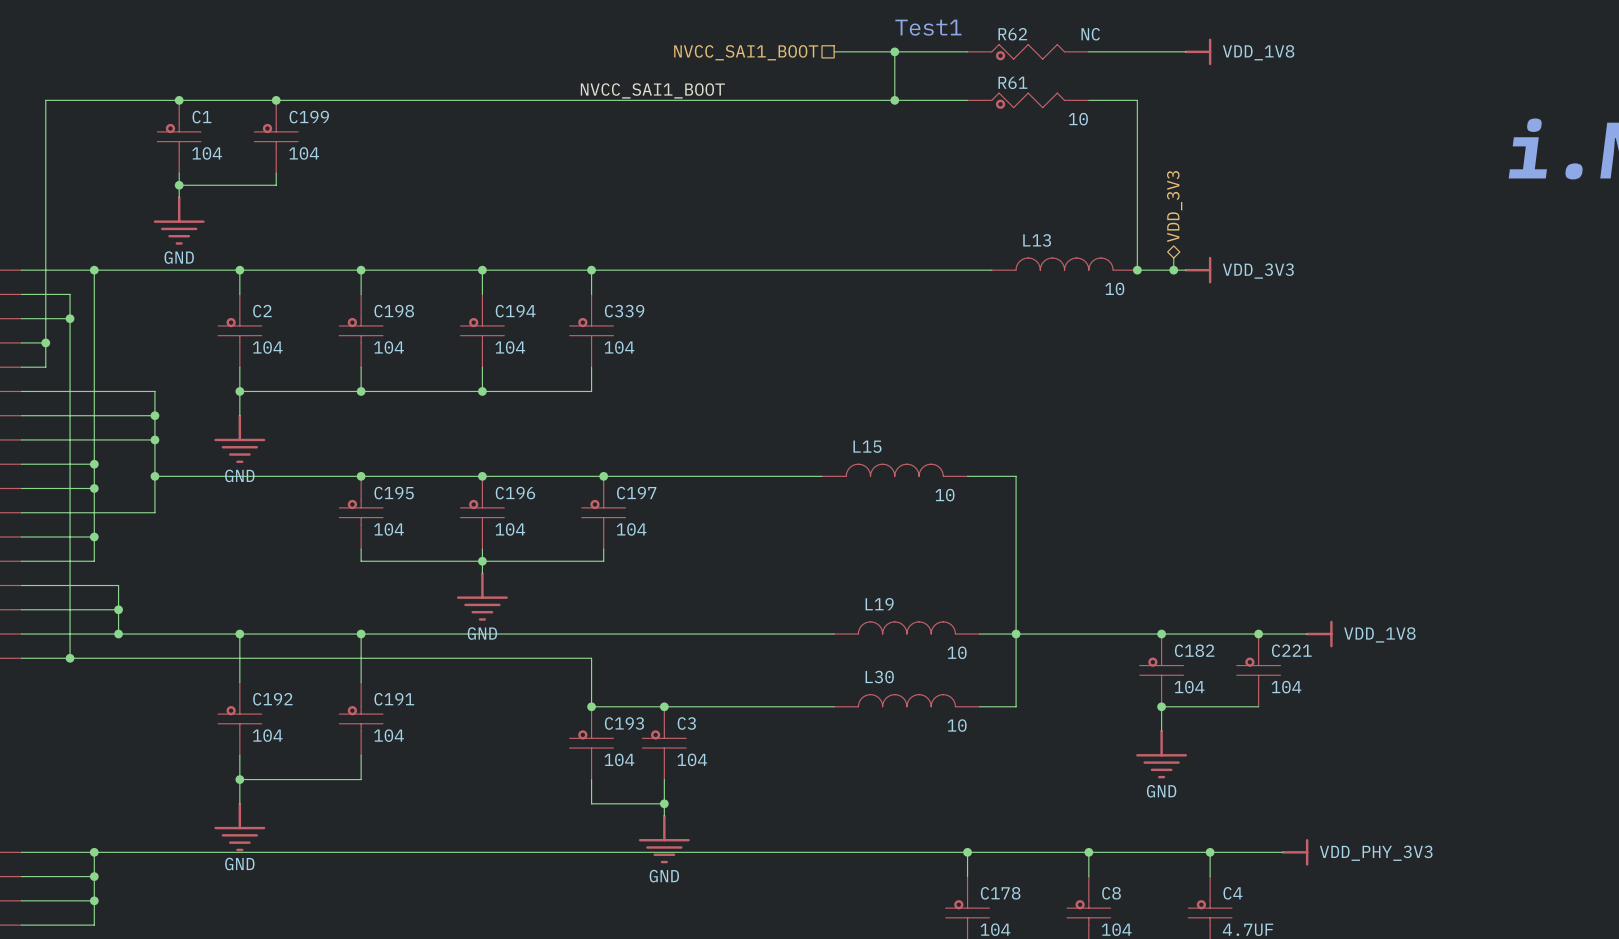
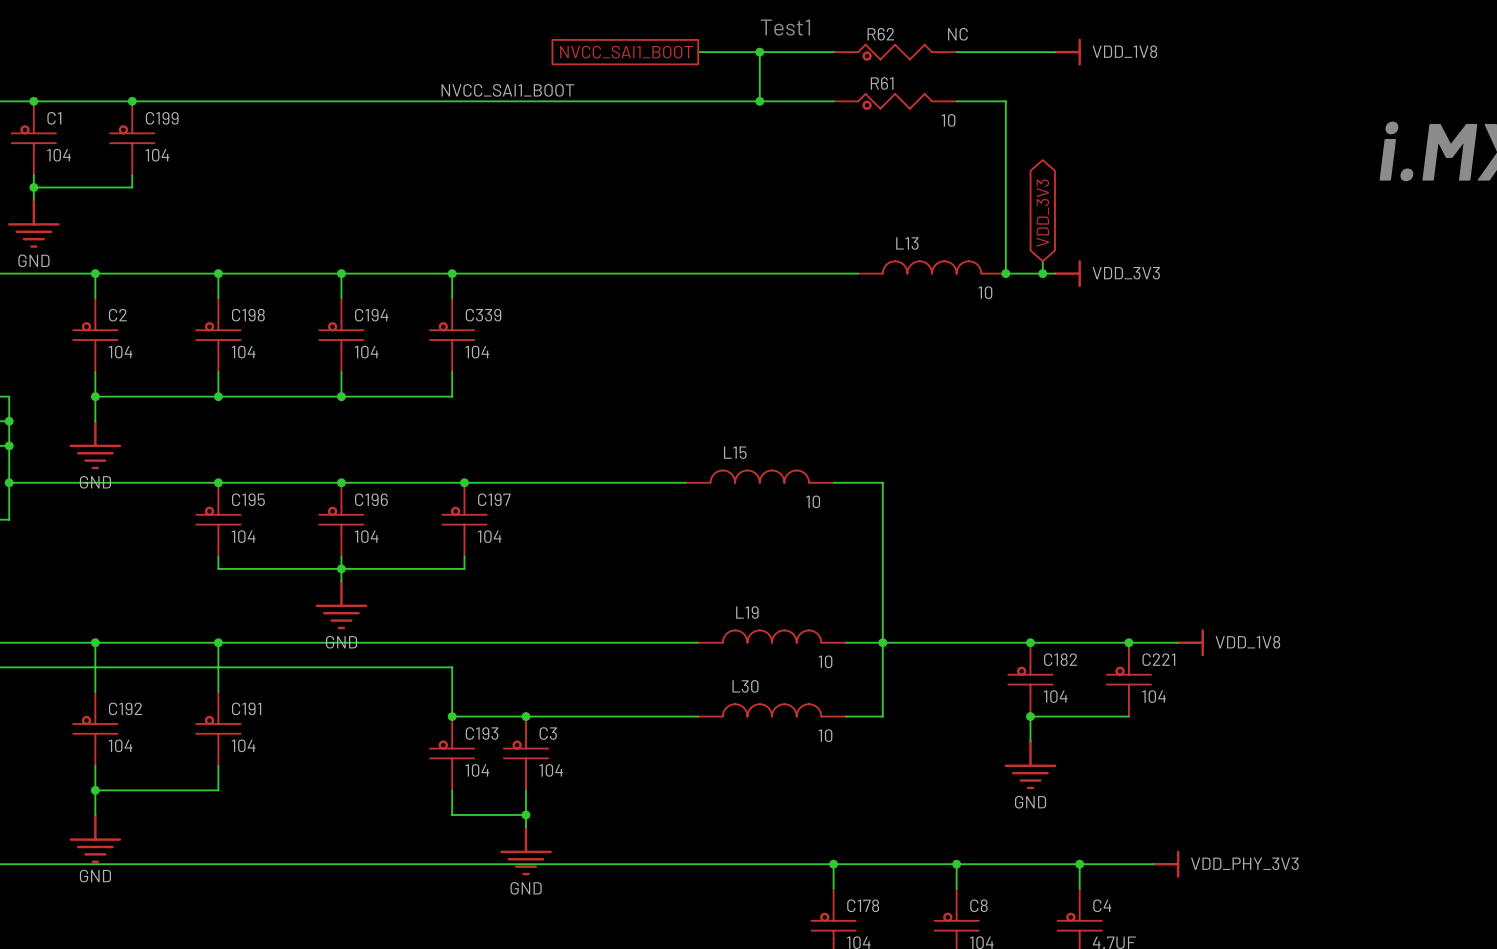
hierarchical label: NVCC_SAI1_BOOT (746, 52) -> none
global label: none -> NVCC_SAI1_BOOT (626, 52)
hierarchical label: VDD_3V3 (1174, 206) -> none
global label: none -> VDD_3V3 (1042, 213)

